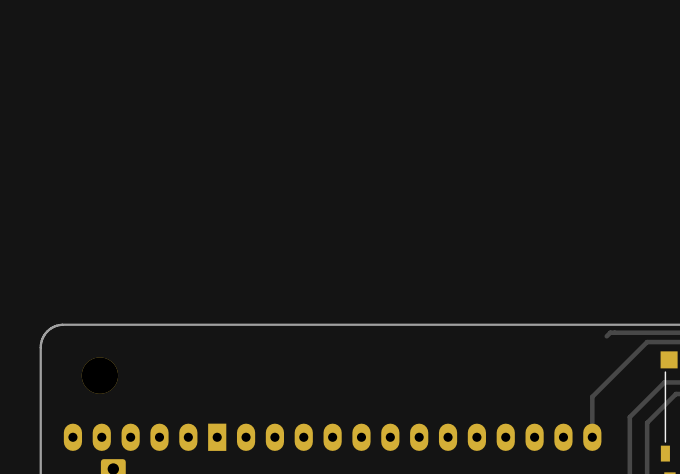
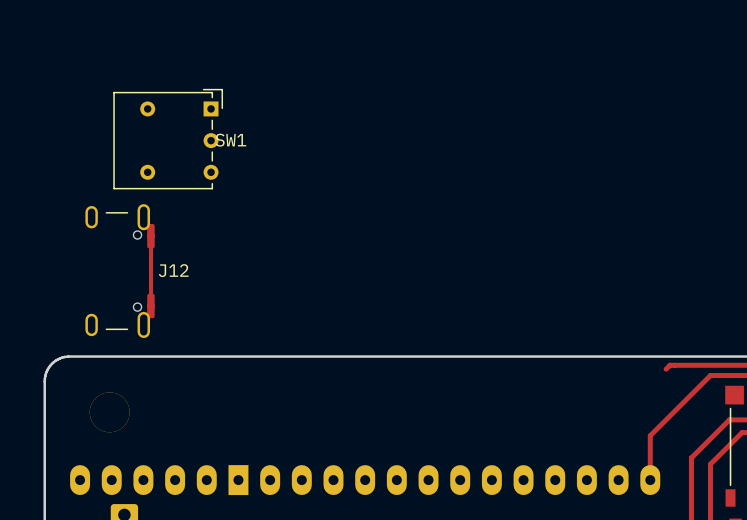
SW1: none -> (168, 139)
J12: none -> (120, 271)

